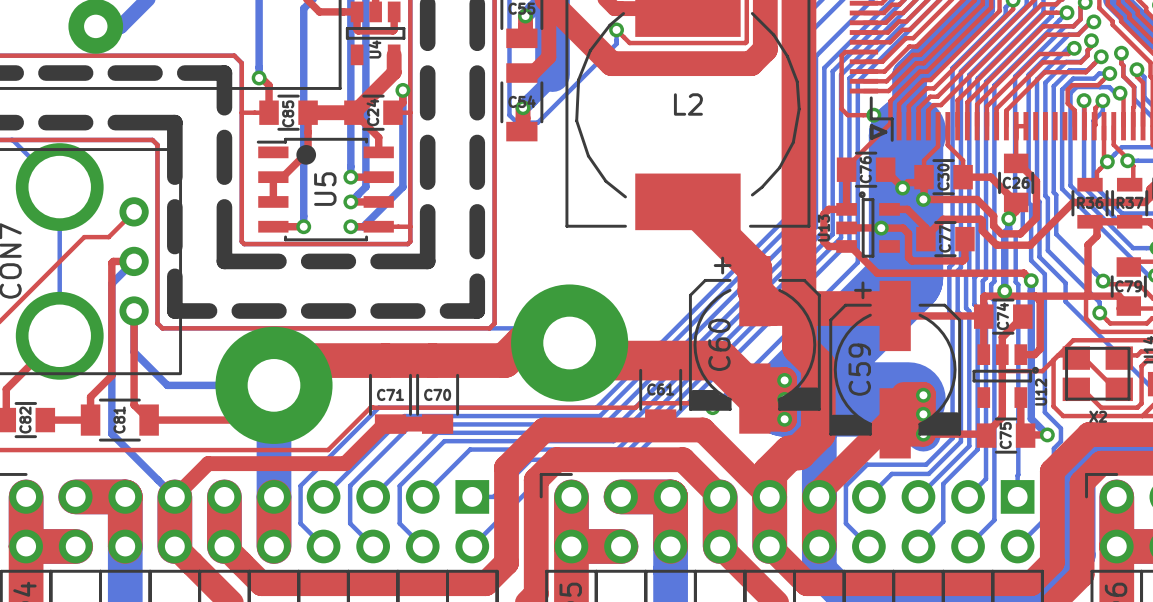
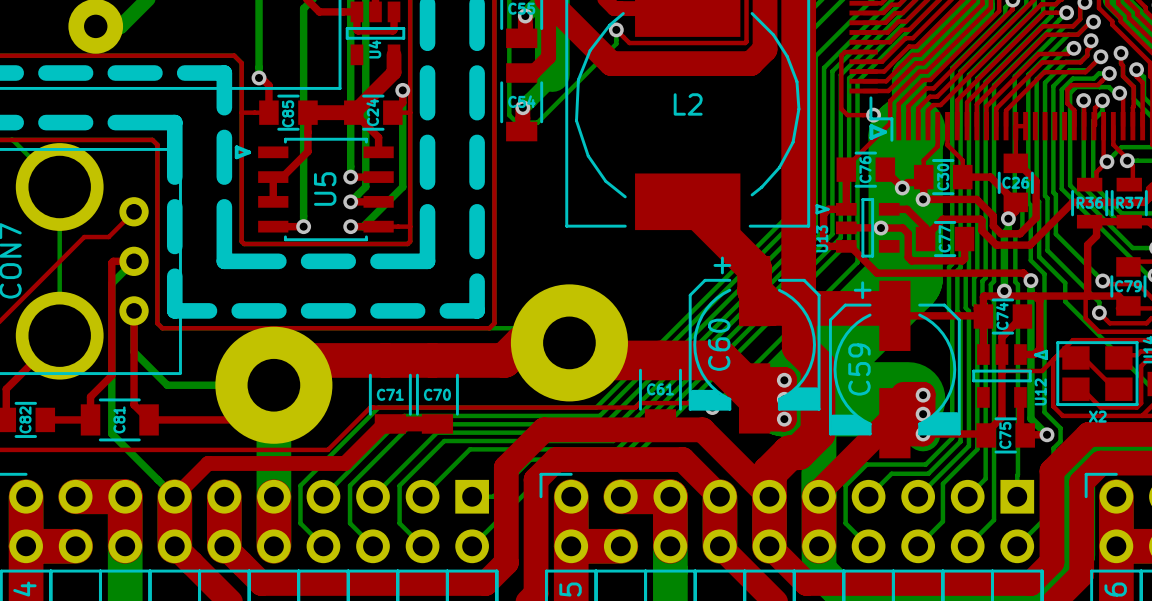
U5 footprint: [256, 137, 394, 242] -> [234, 137, 394, 242]
U13 footprint: [836, 191, 900, 258] -> [815, 198, 900, 258]
U12 footprint: [972, 344, 1039, 408] -> [972, 344, 1049, 408]
X2 footprint: [1062, 346, 1133, 402] -> [1056, 341, 1139, 407]

